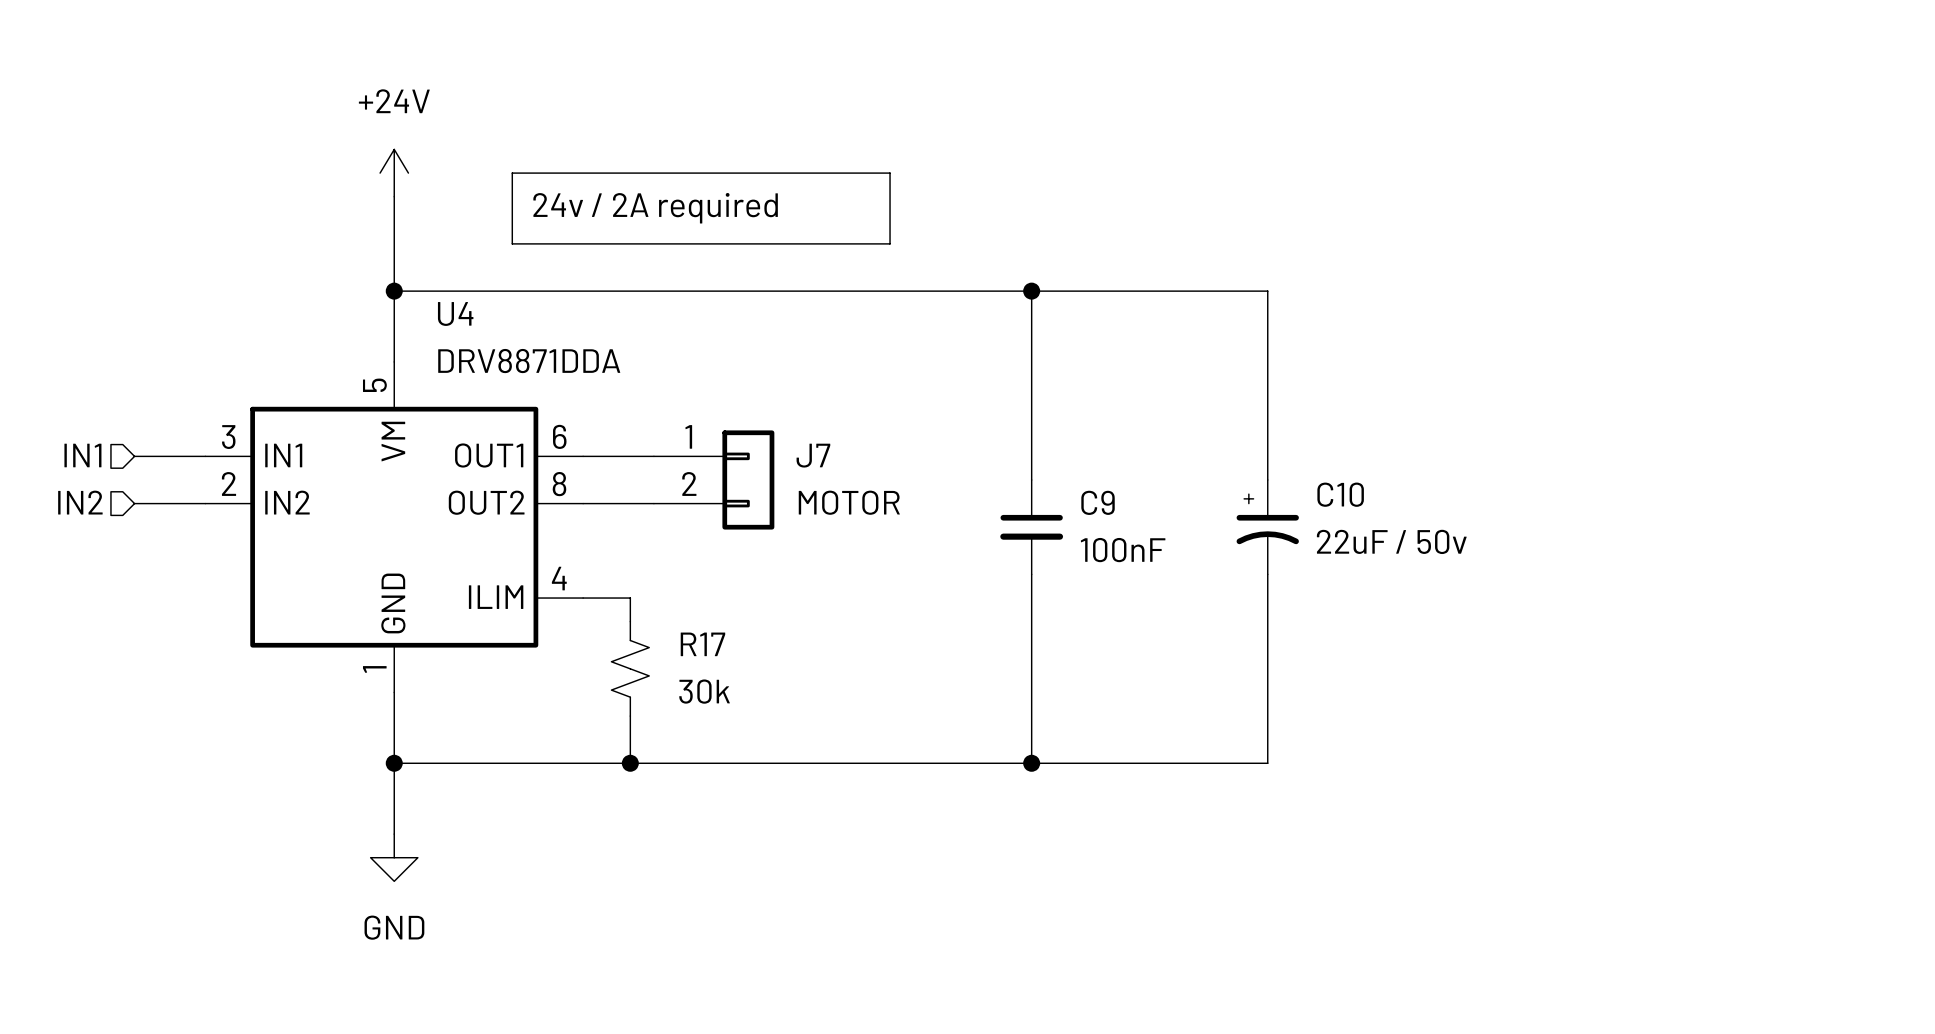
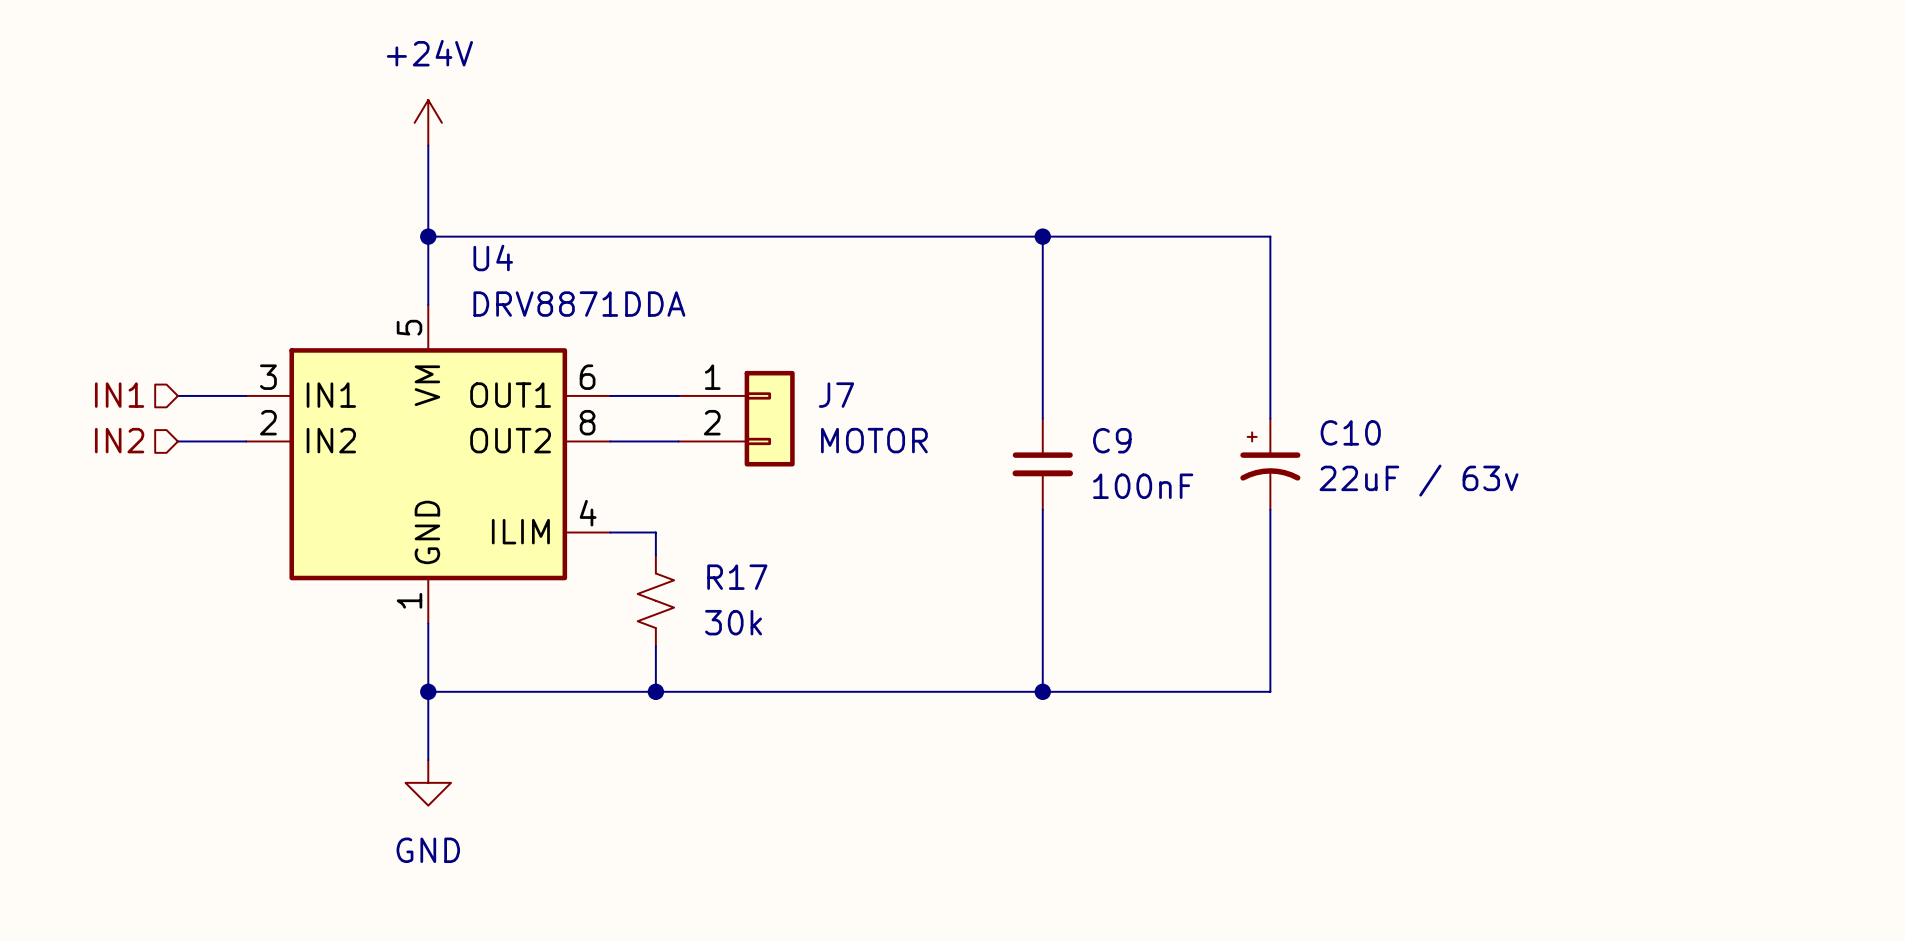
line: (512, 173) (890, 173) (890, 243) (512, 243) (512, 173) -> none
text: 24v / 2A required (655, 208) -> none
C10 value: 22uF / 50v (1391, 541) -> 22uF / 63v (1419, 480)

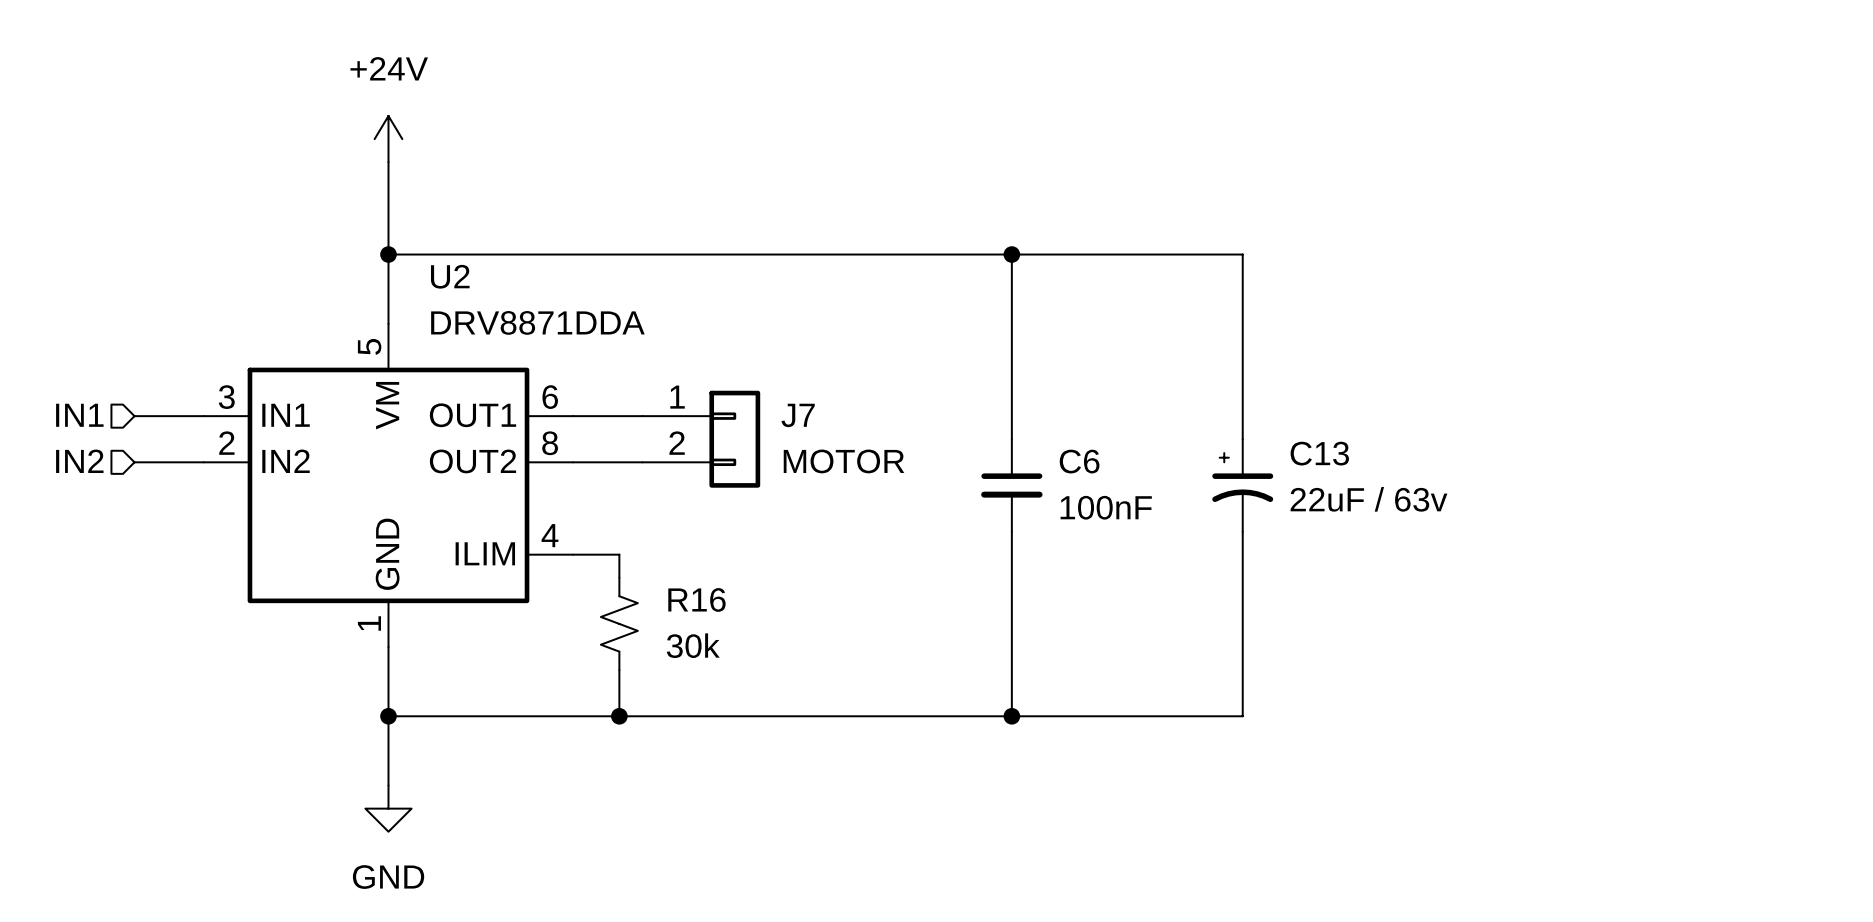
U4 name: U4 (493, 258) -> U2 (450, 276)
C10 name: C10 (1350, 432) -> C13 (1319, 453)
C9 name: C9 (1112, 440) -> C6 (1079, 461)
R17 name: R17 (737, 577) -> R16 (696, 599)

